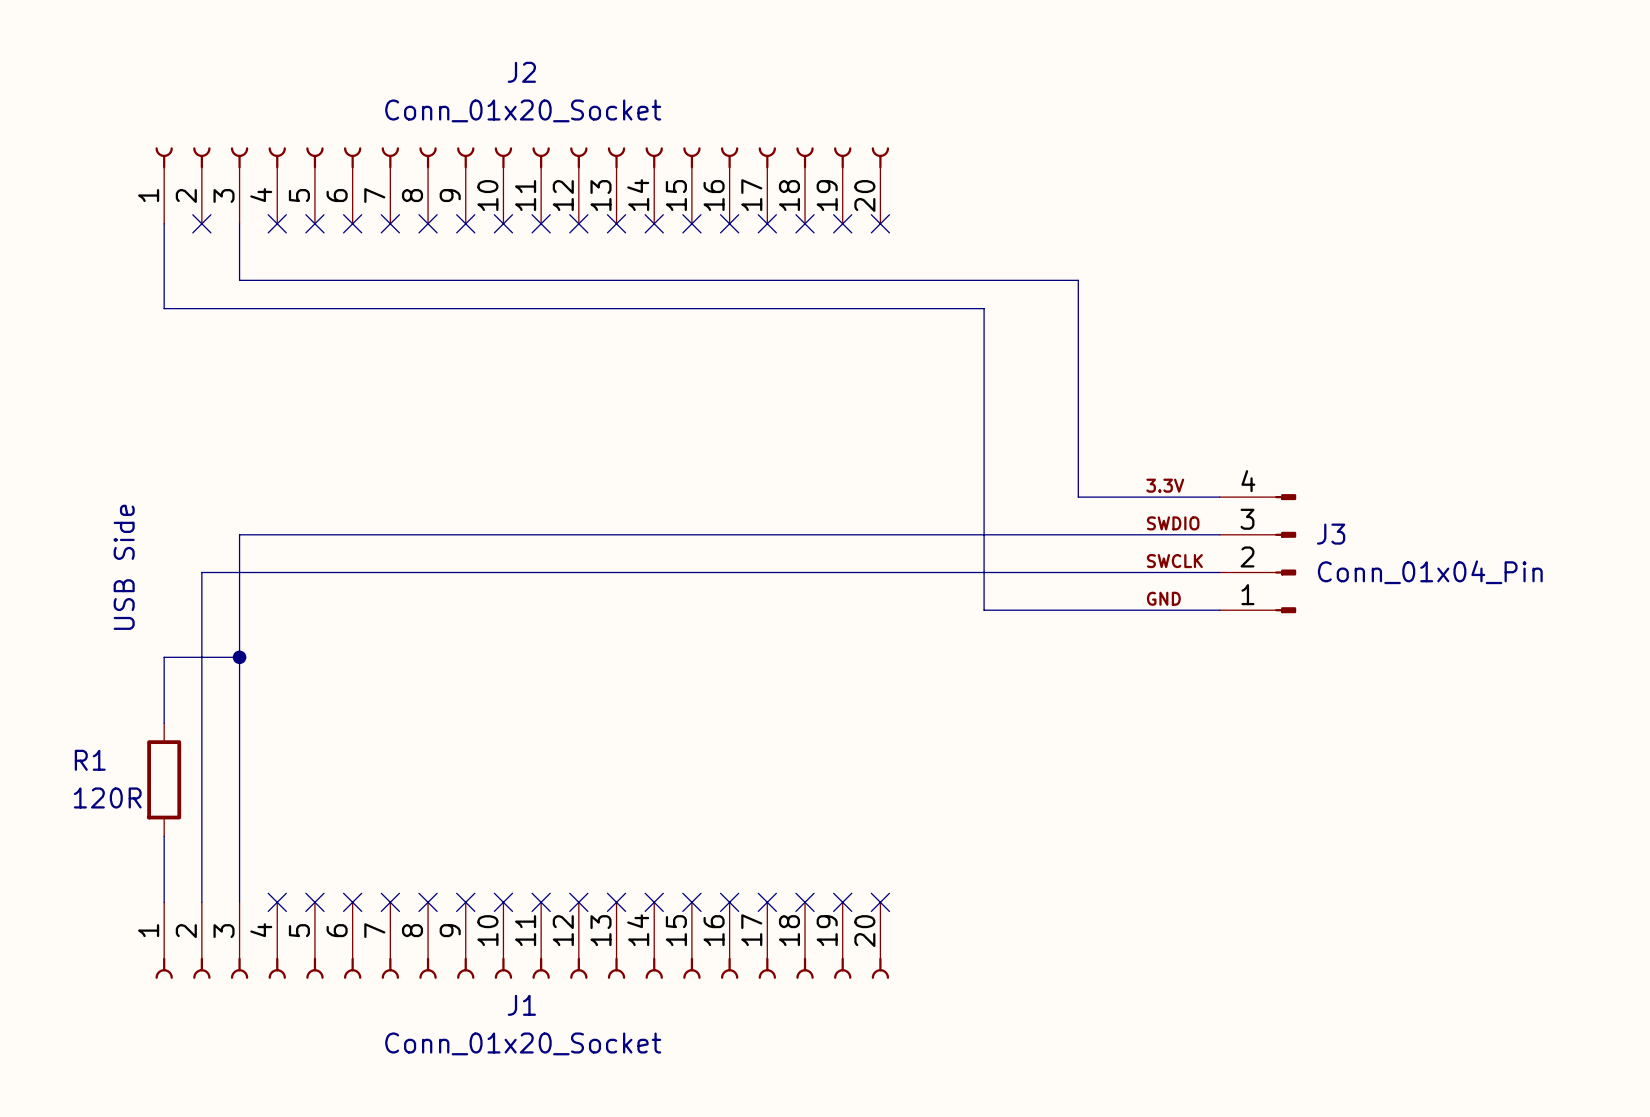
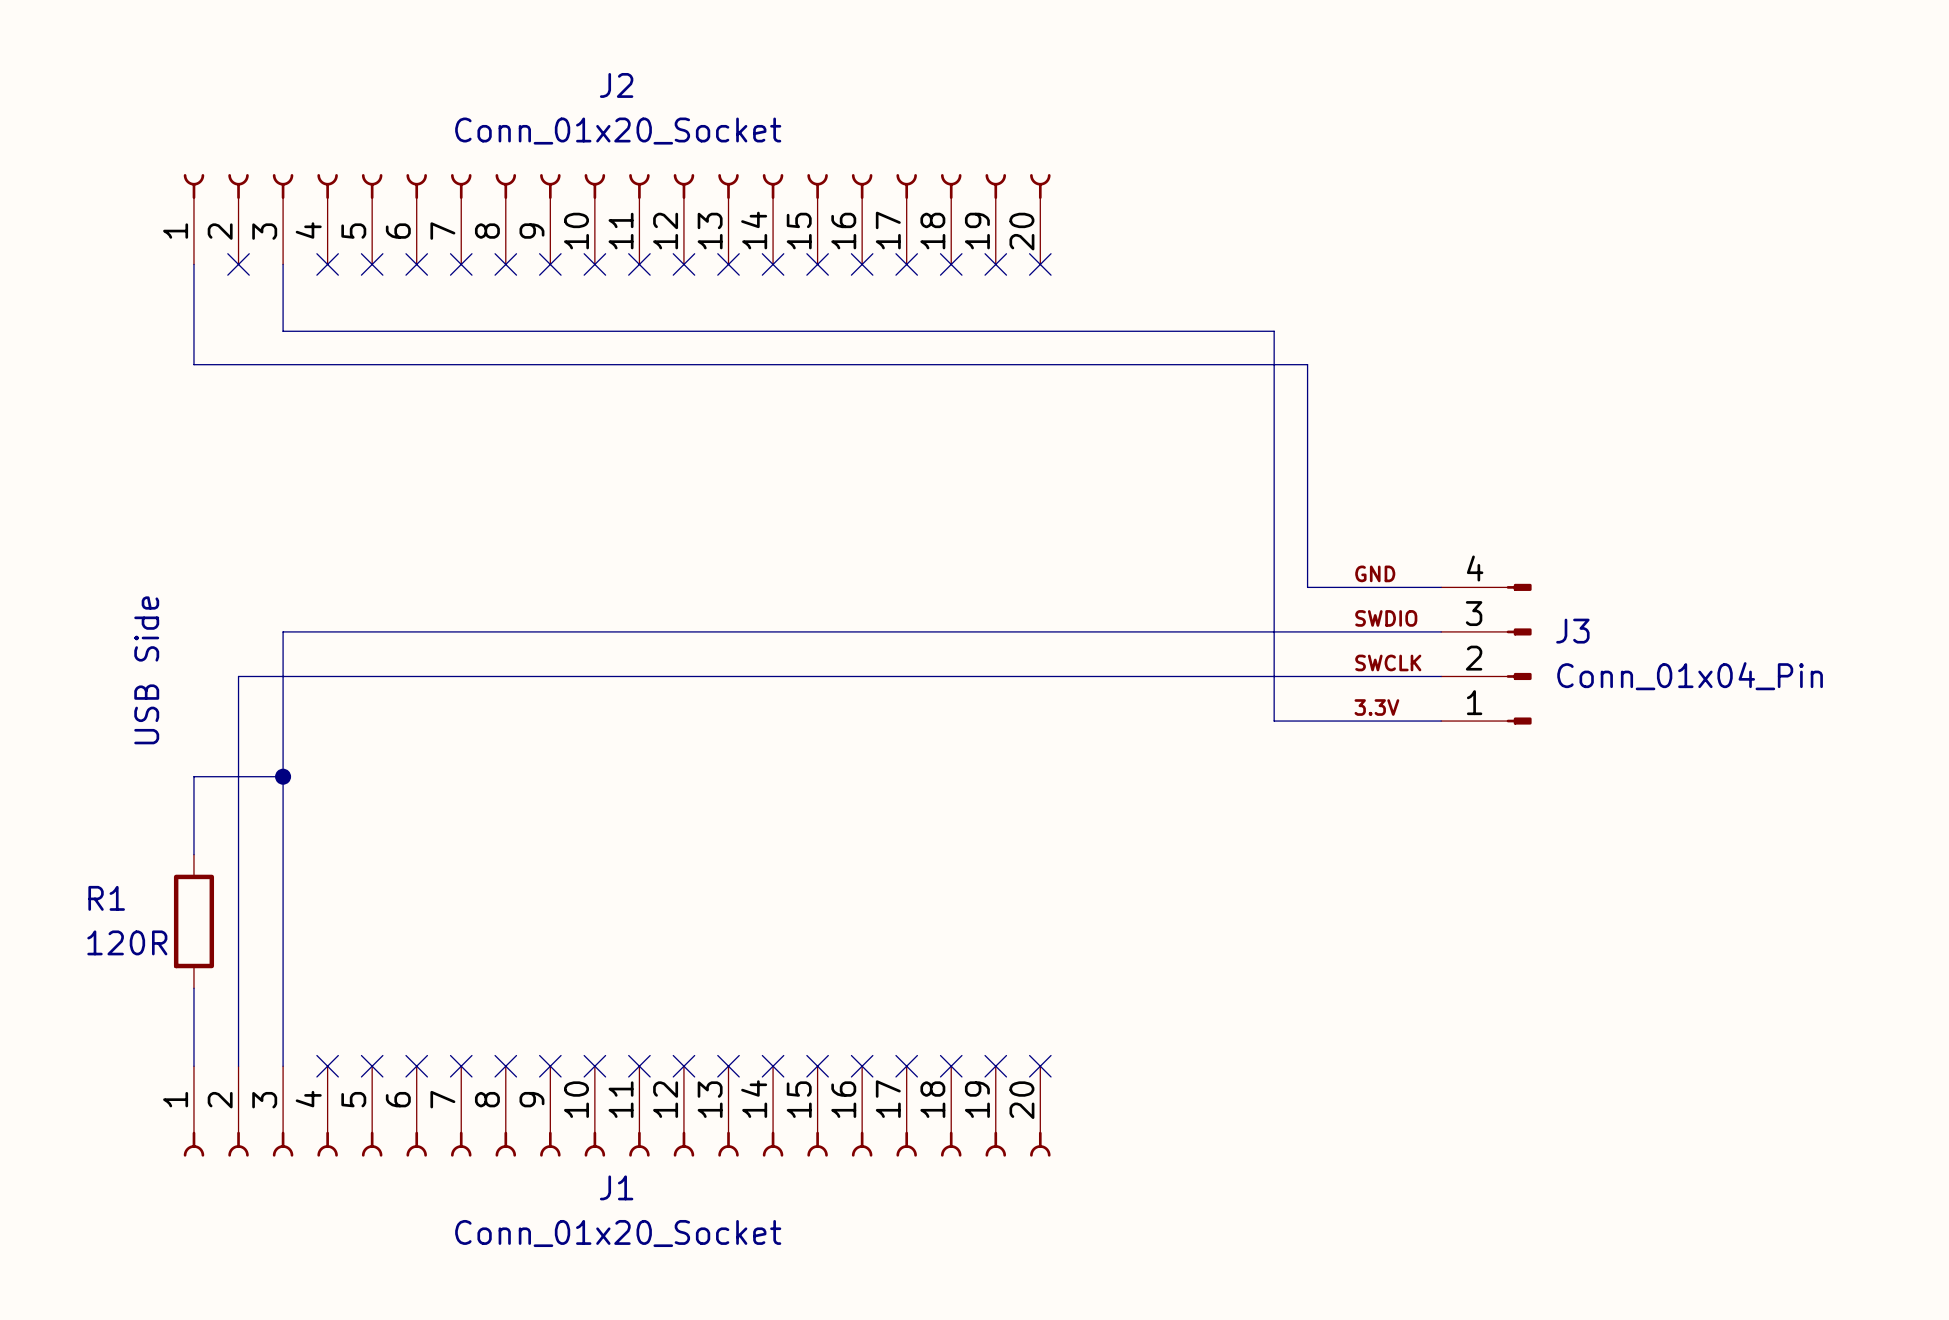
wire: (984, 308) (984, 610) (1078, 610) -> (1162, 364) (1307, 364) (1307, 587)
label: 3.3V (1165, 485) -> GND (1375, 573)
wire: (1078, 497) (1106, 497) -> (1274, 587) (1274, 721)
label: GND (1163, 598) -> 3.3V (1376, 707)

